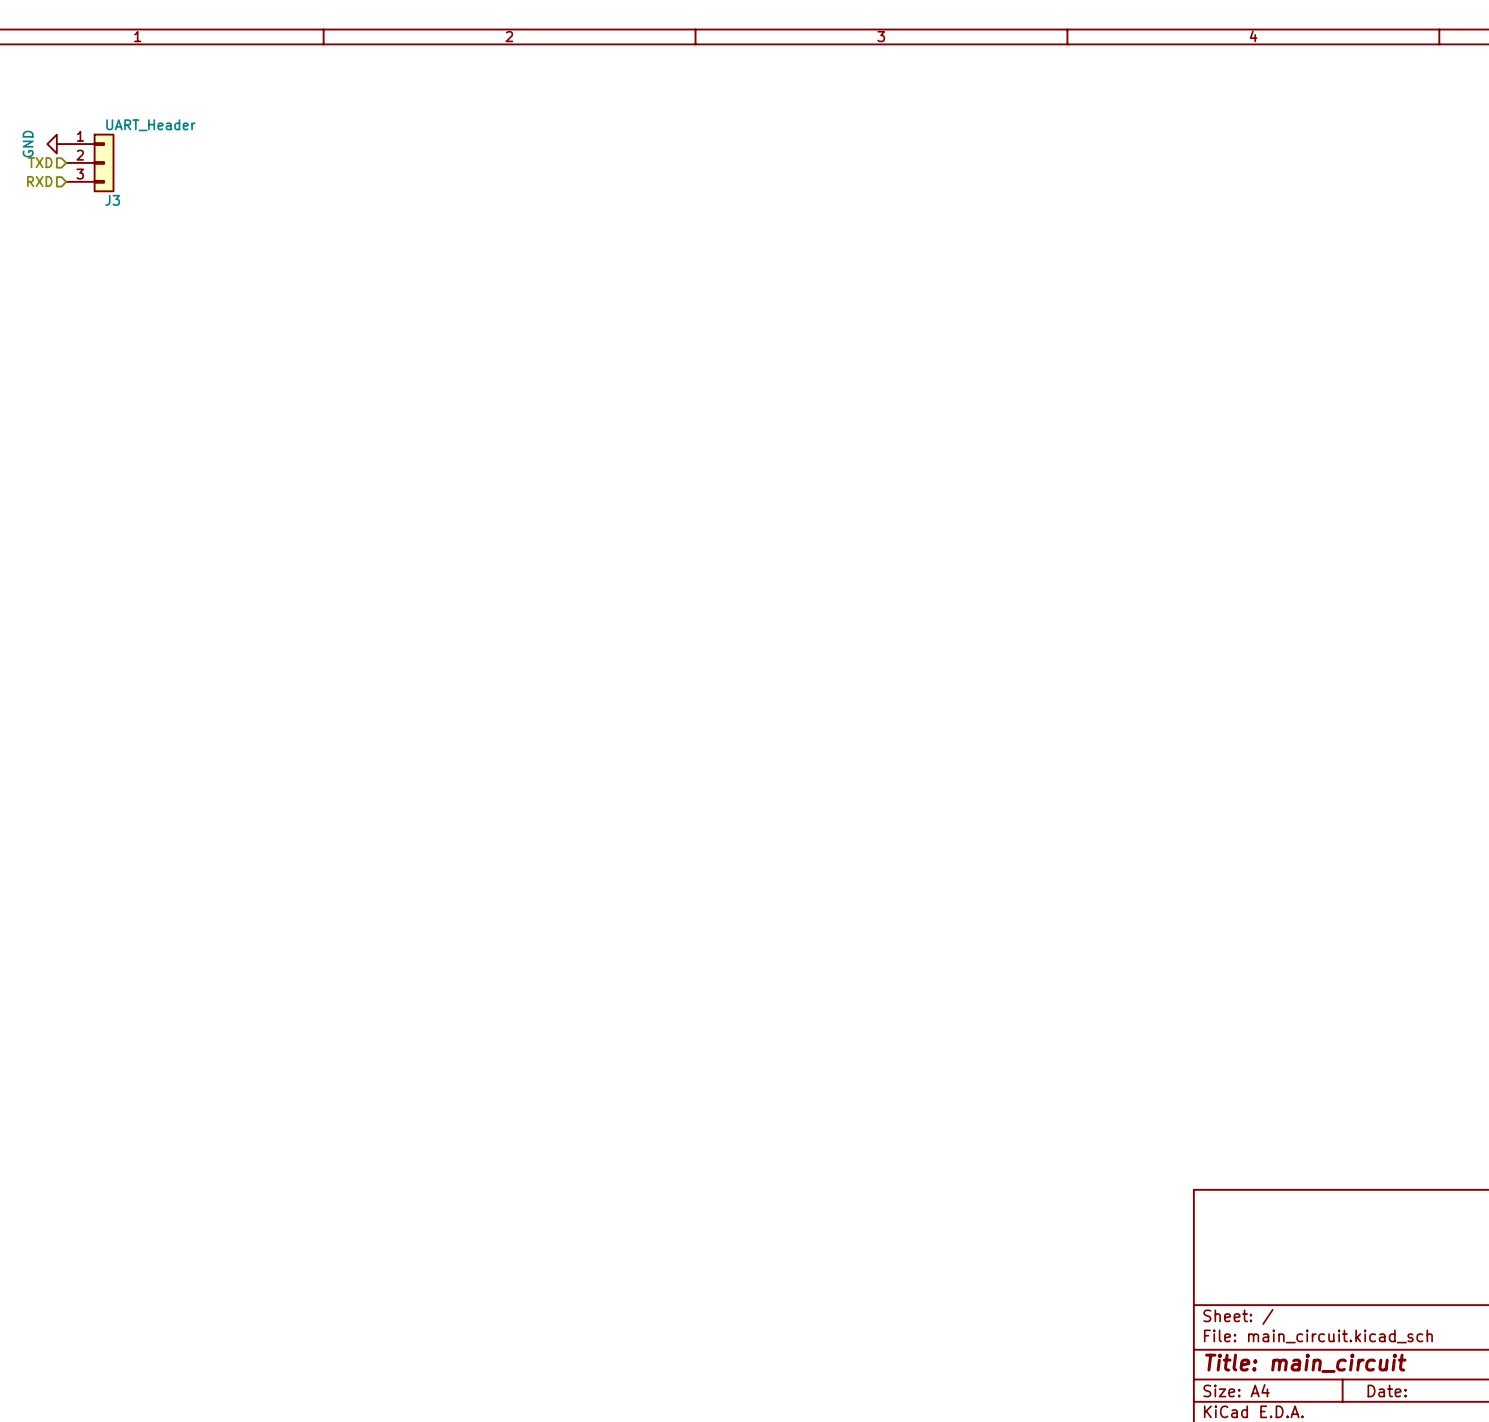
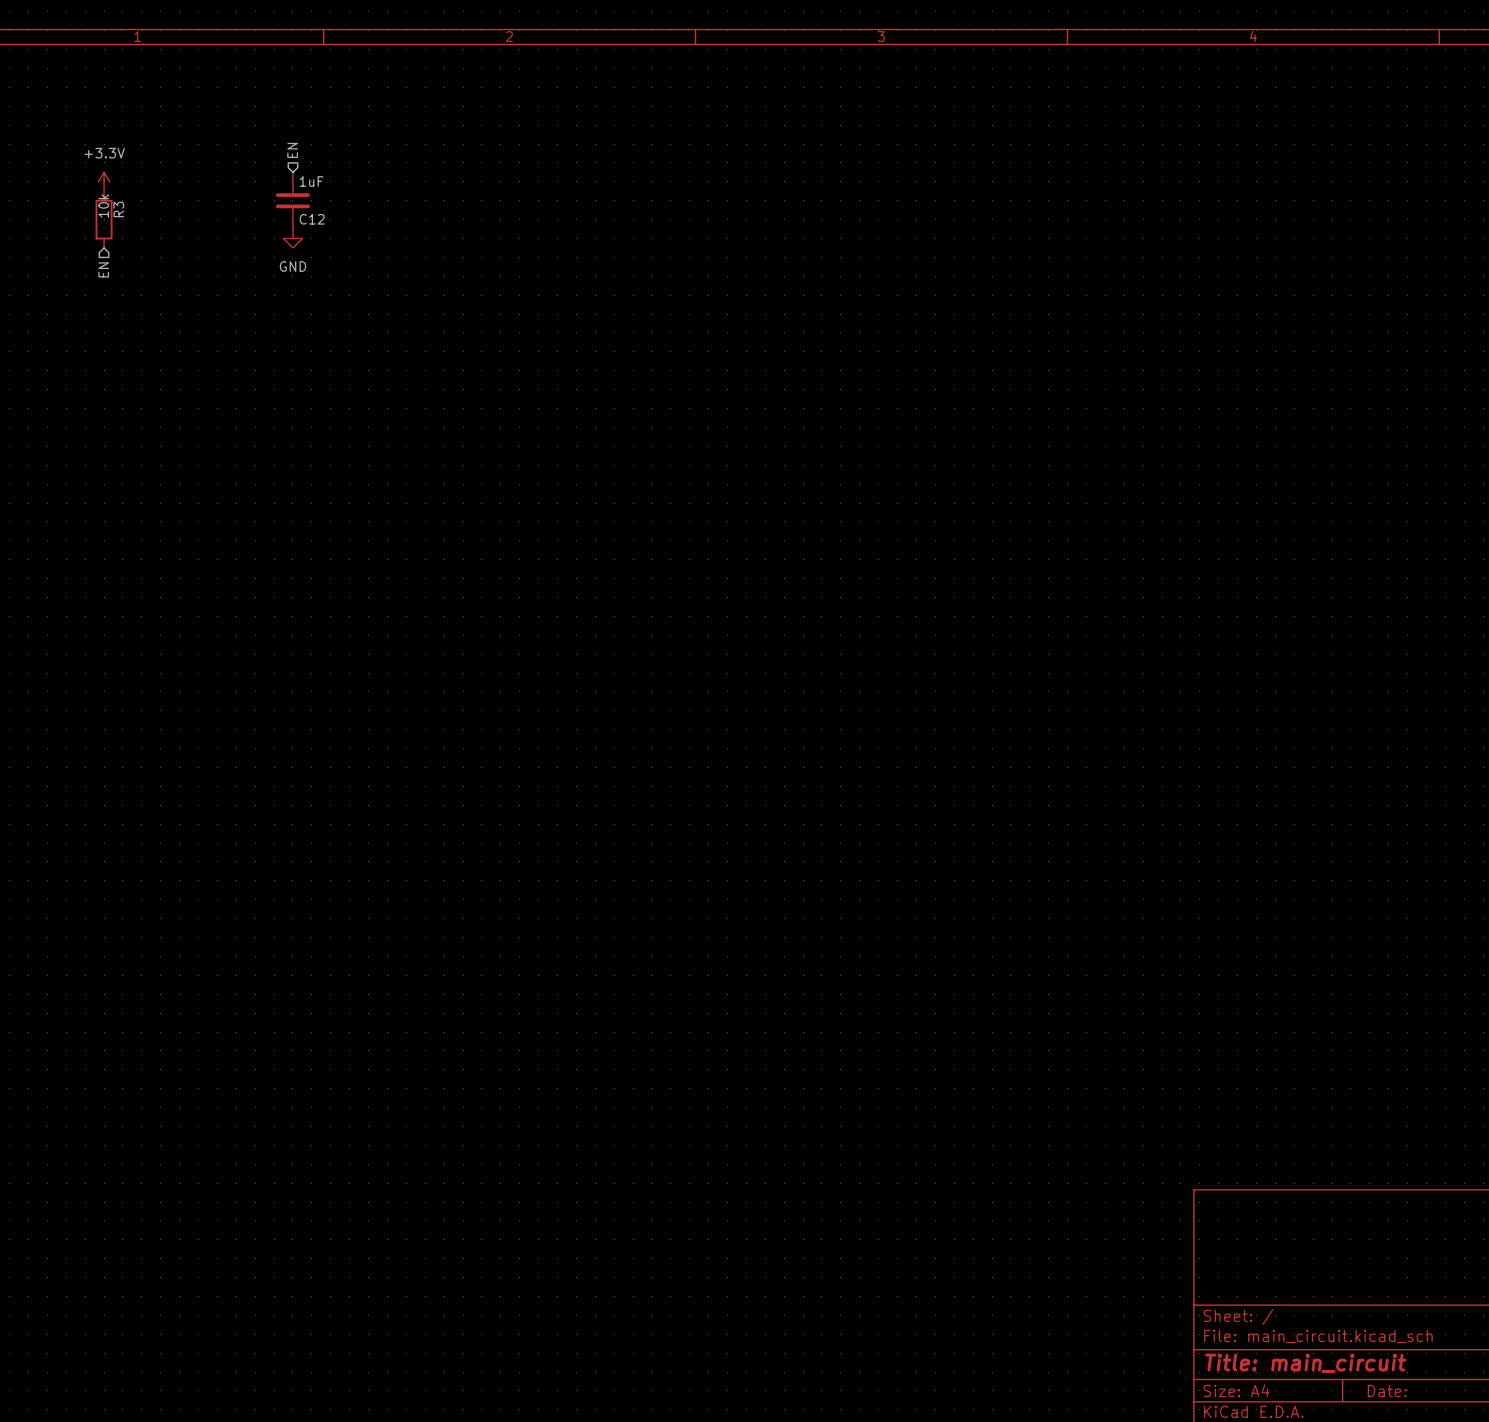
power symbol: GND (56, 144) -> none
hierarchical label: none -> EN (292, 150)
hierarchical label: TXD (40, 162) -> none
J3: UART_Header (90, 162) -> none
hierarchical label: RXD (39, 181) -> none
power symbol: none -> +3.3V (104, 181)
C12: none -> 1uF (292, 200)
R3: none -> 10k (104, 219)
power symbol: none -> GND (292, 238)
hierarchical label: none -> EN (103, 269)

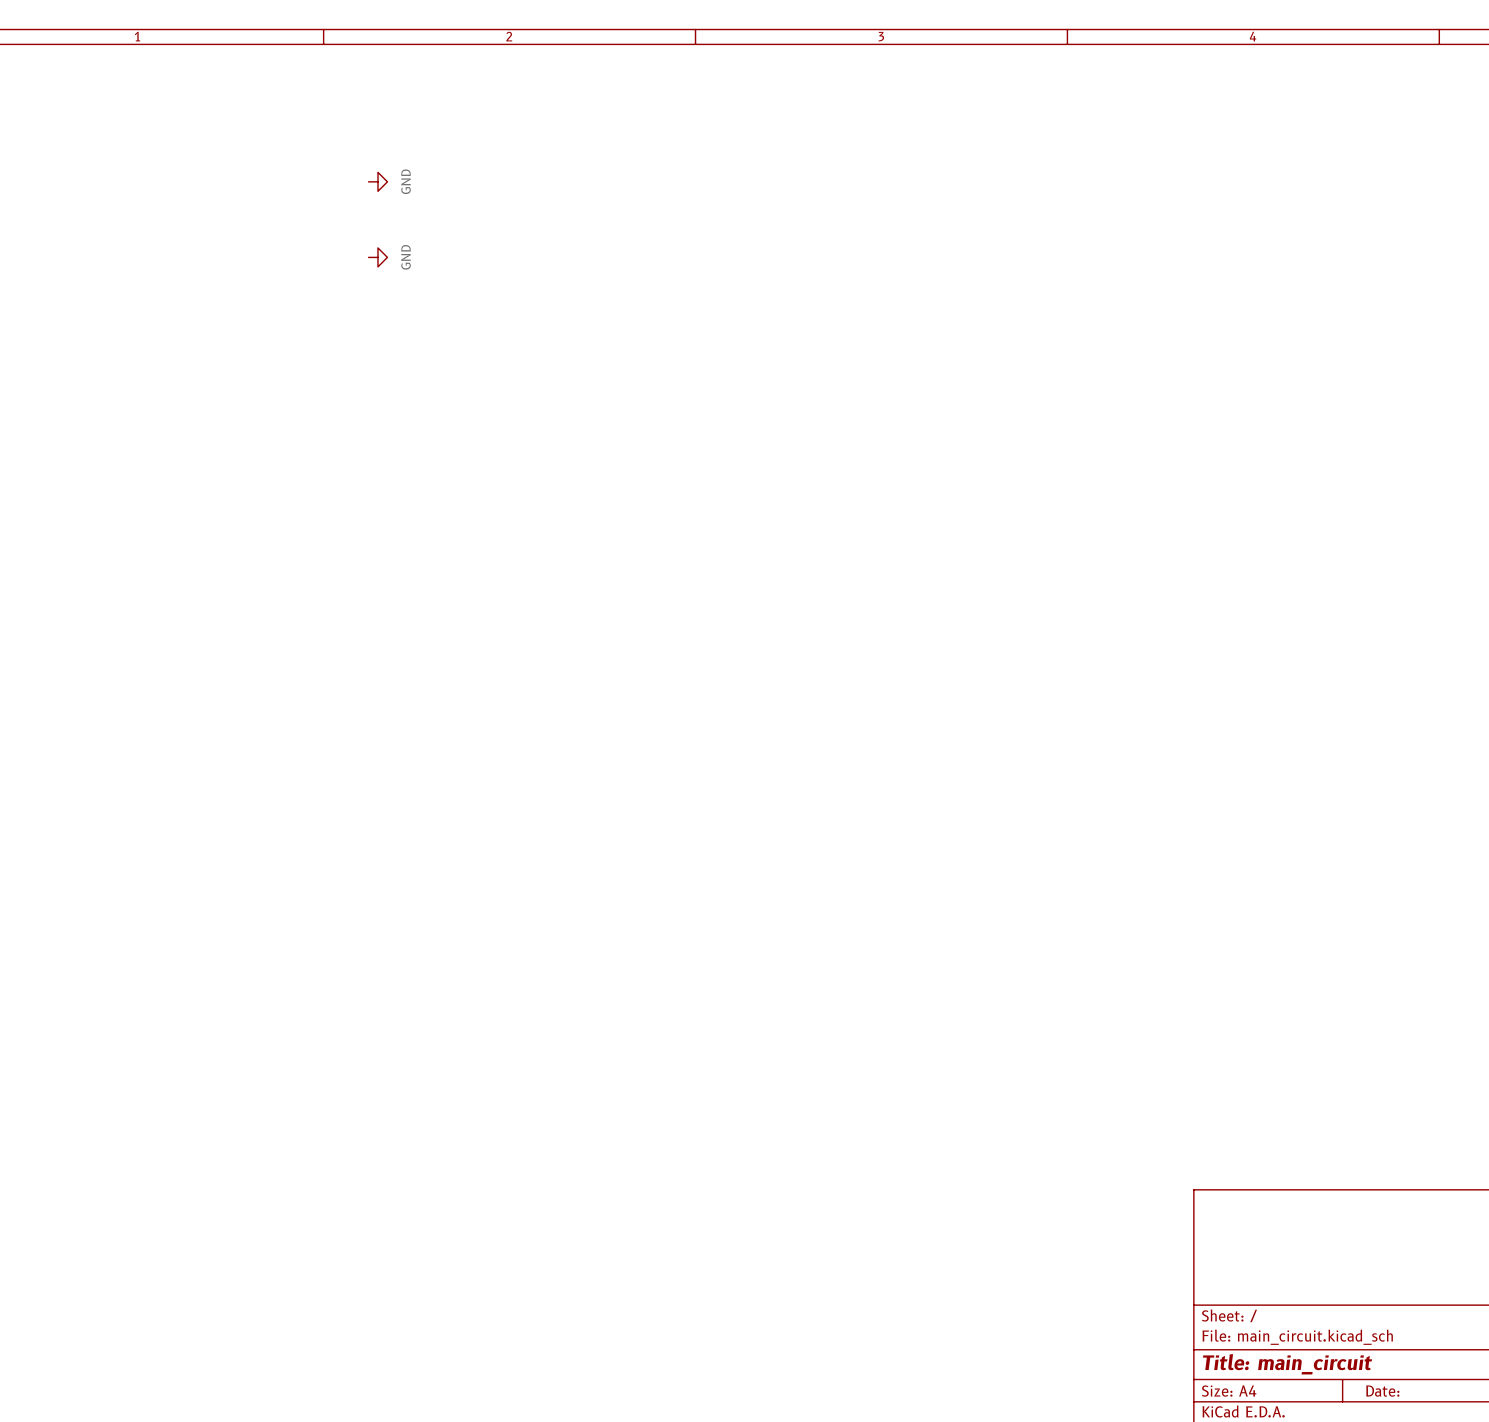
hierarchical label: EN (292, 150) -> none
power symbol: +3.3V (104, 181) -> none
power symbol: none -> GND (377, 181)
C12: 1uF (292, 200) -> none
R3: 10k (104, 219) -> none
power symbol: GND (292, 238) -> none
power symbol: none -> GND (377, 257)
hierarchical label: EN (103, 269) -> none

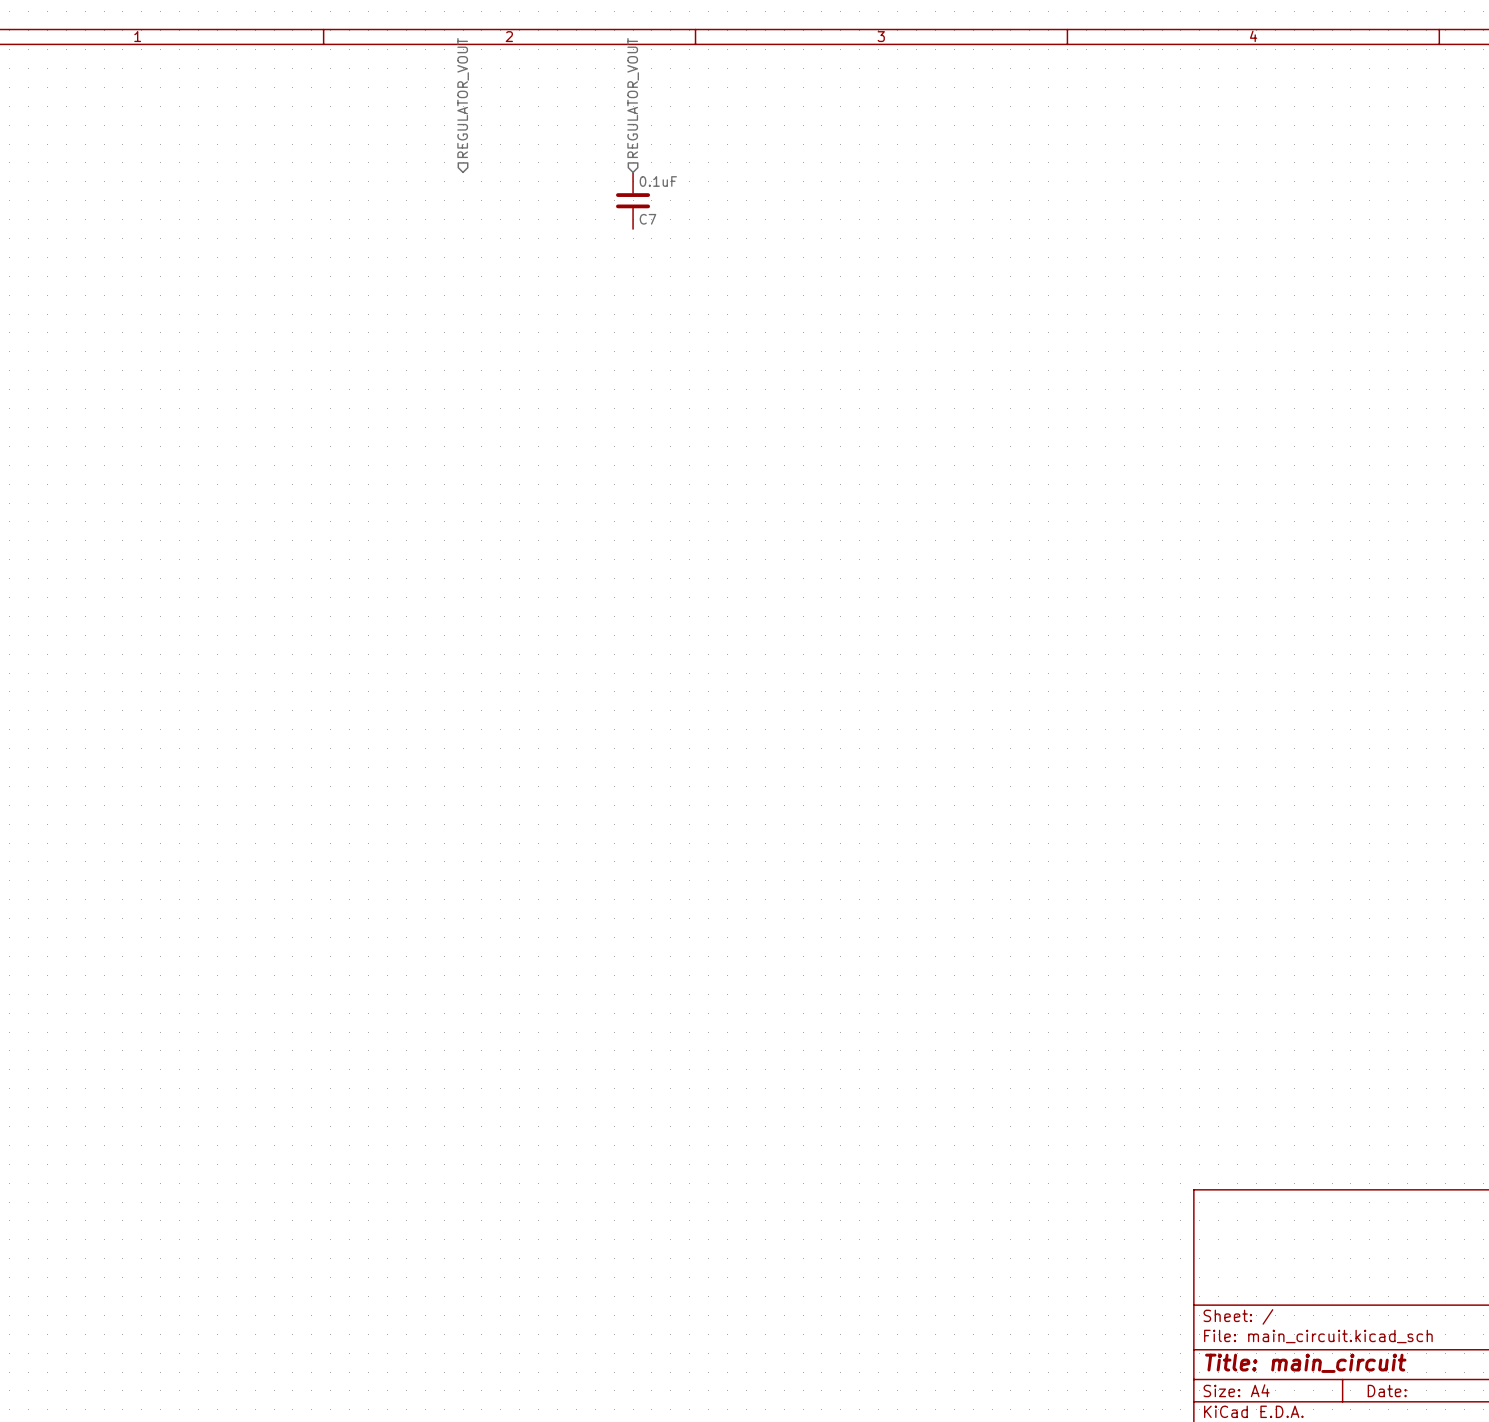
hierarchical label: none -> REGULATOR_VOUT (463, 98)
hierarchical label: none -> REGULATOR_VOUT (633, 98)
power symbol: GND (377, 181) -> none
C7: none -> 0.1uF (633, 200)
power symbol: GND (377, 257) -> none

